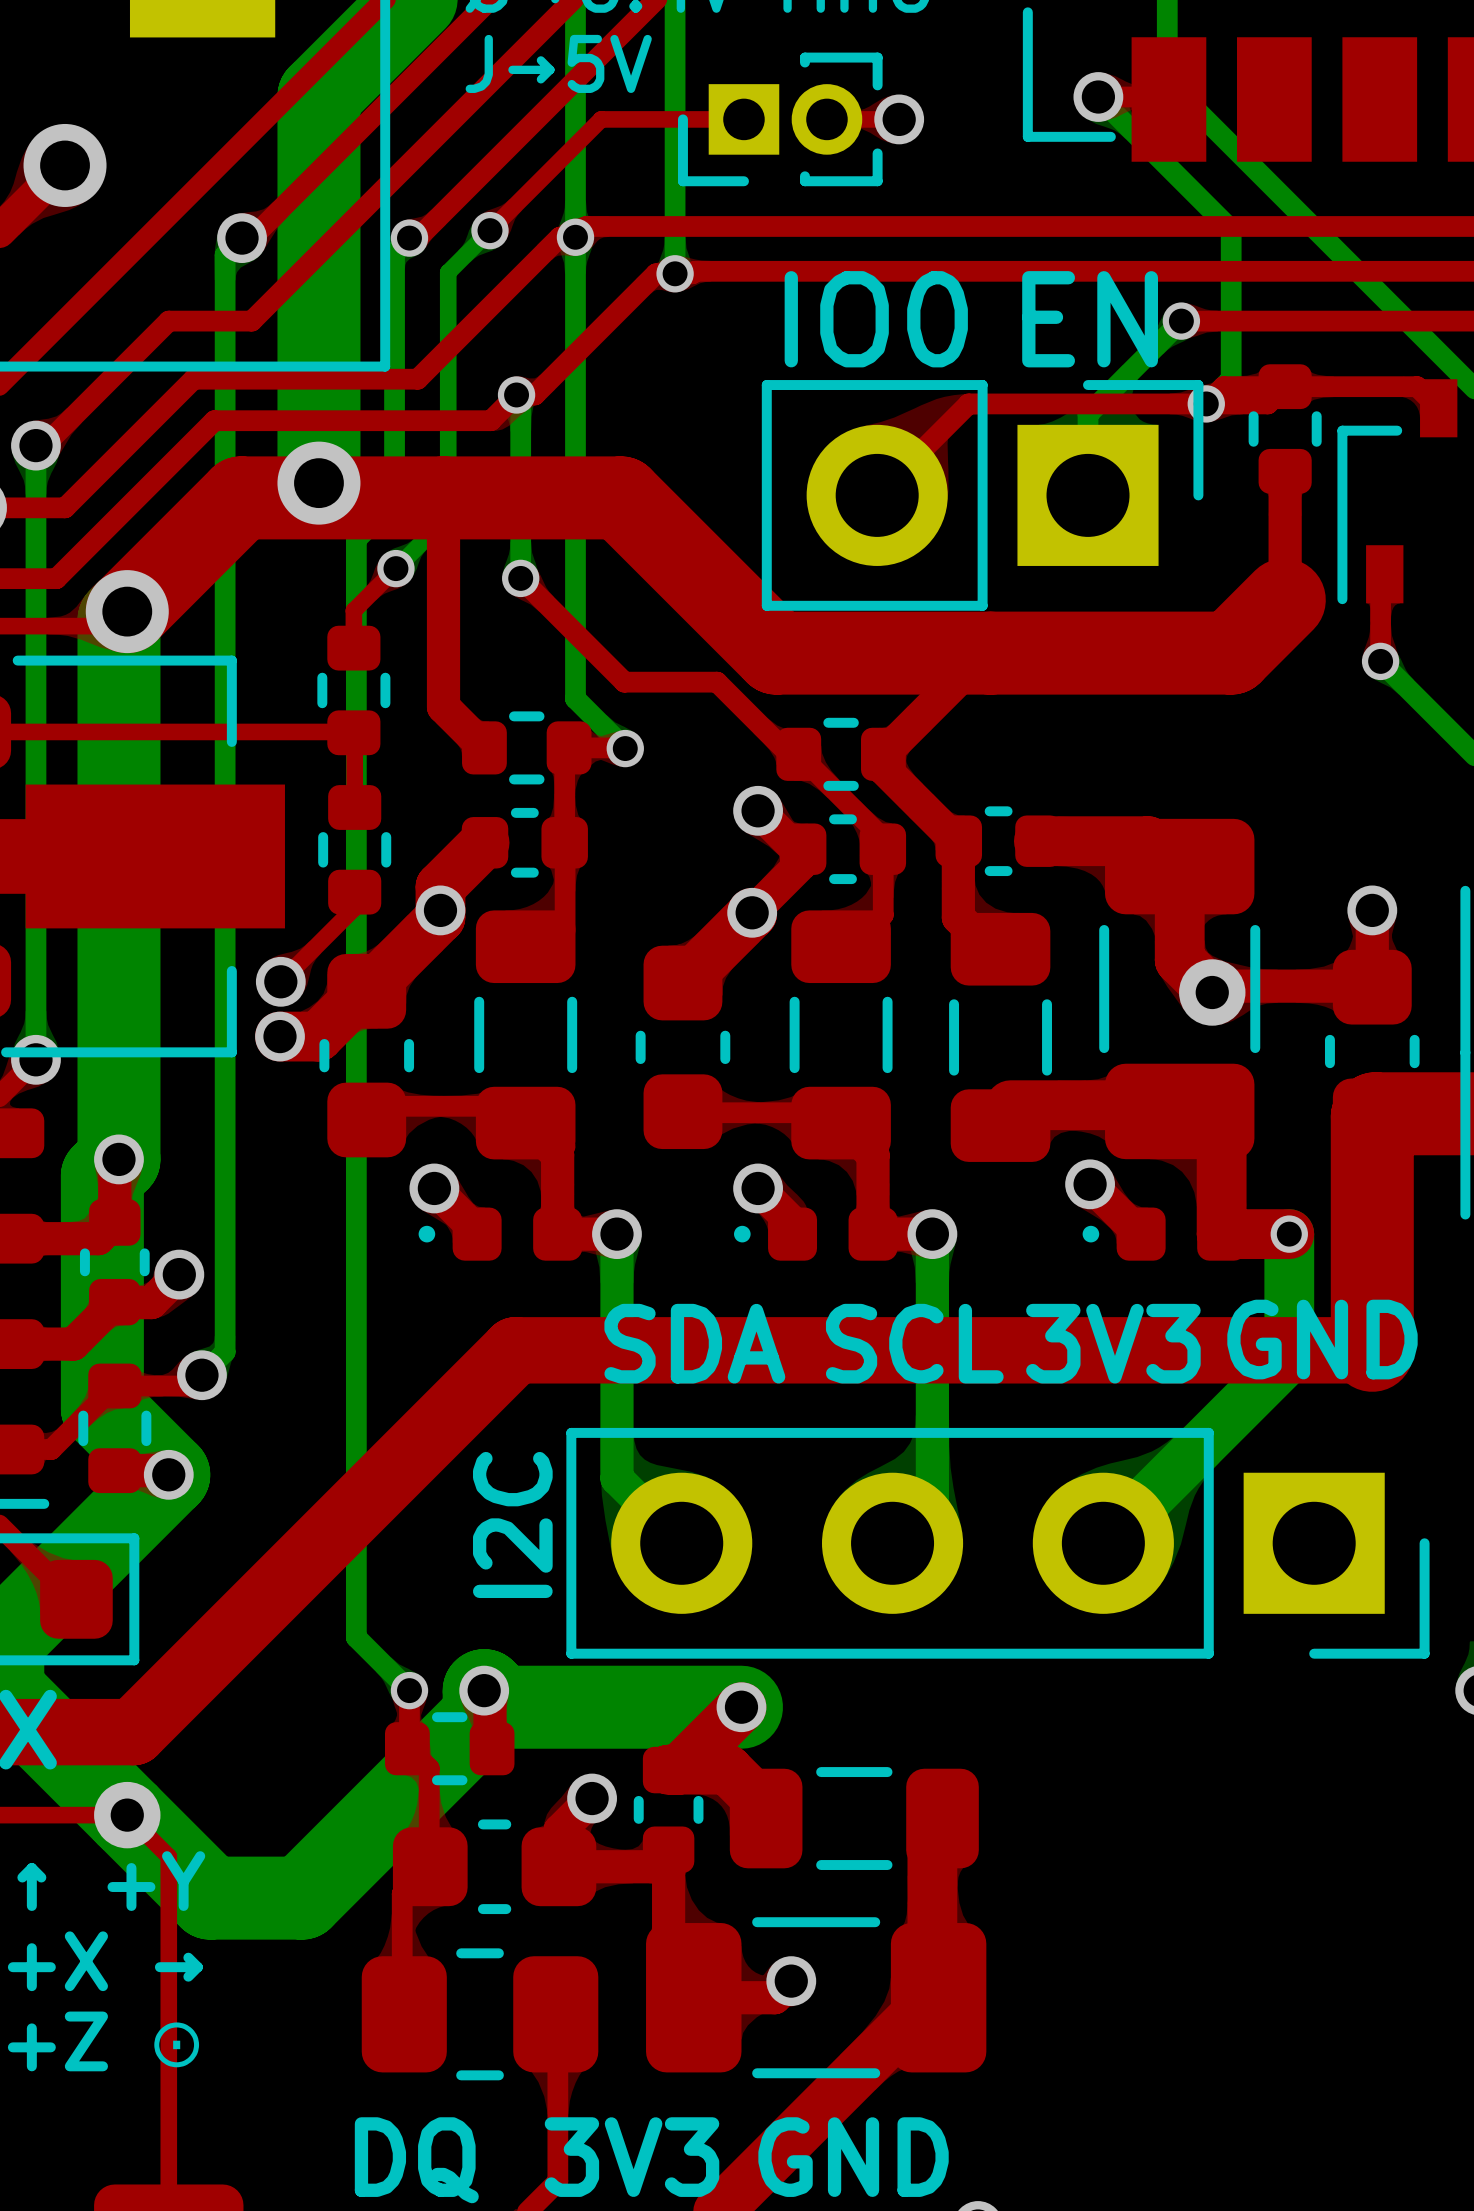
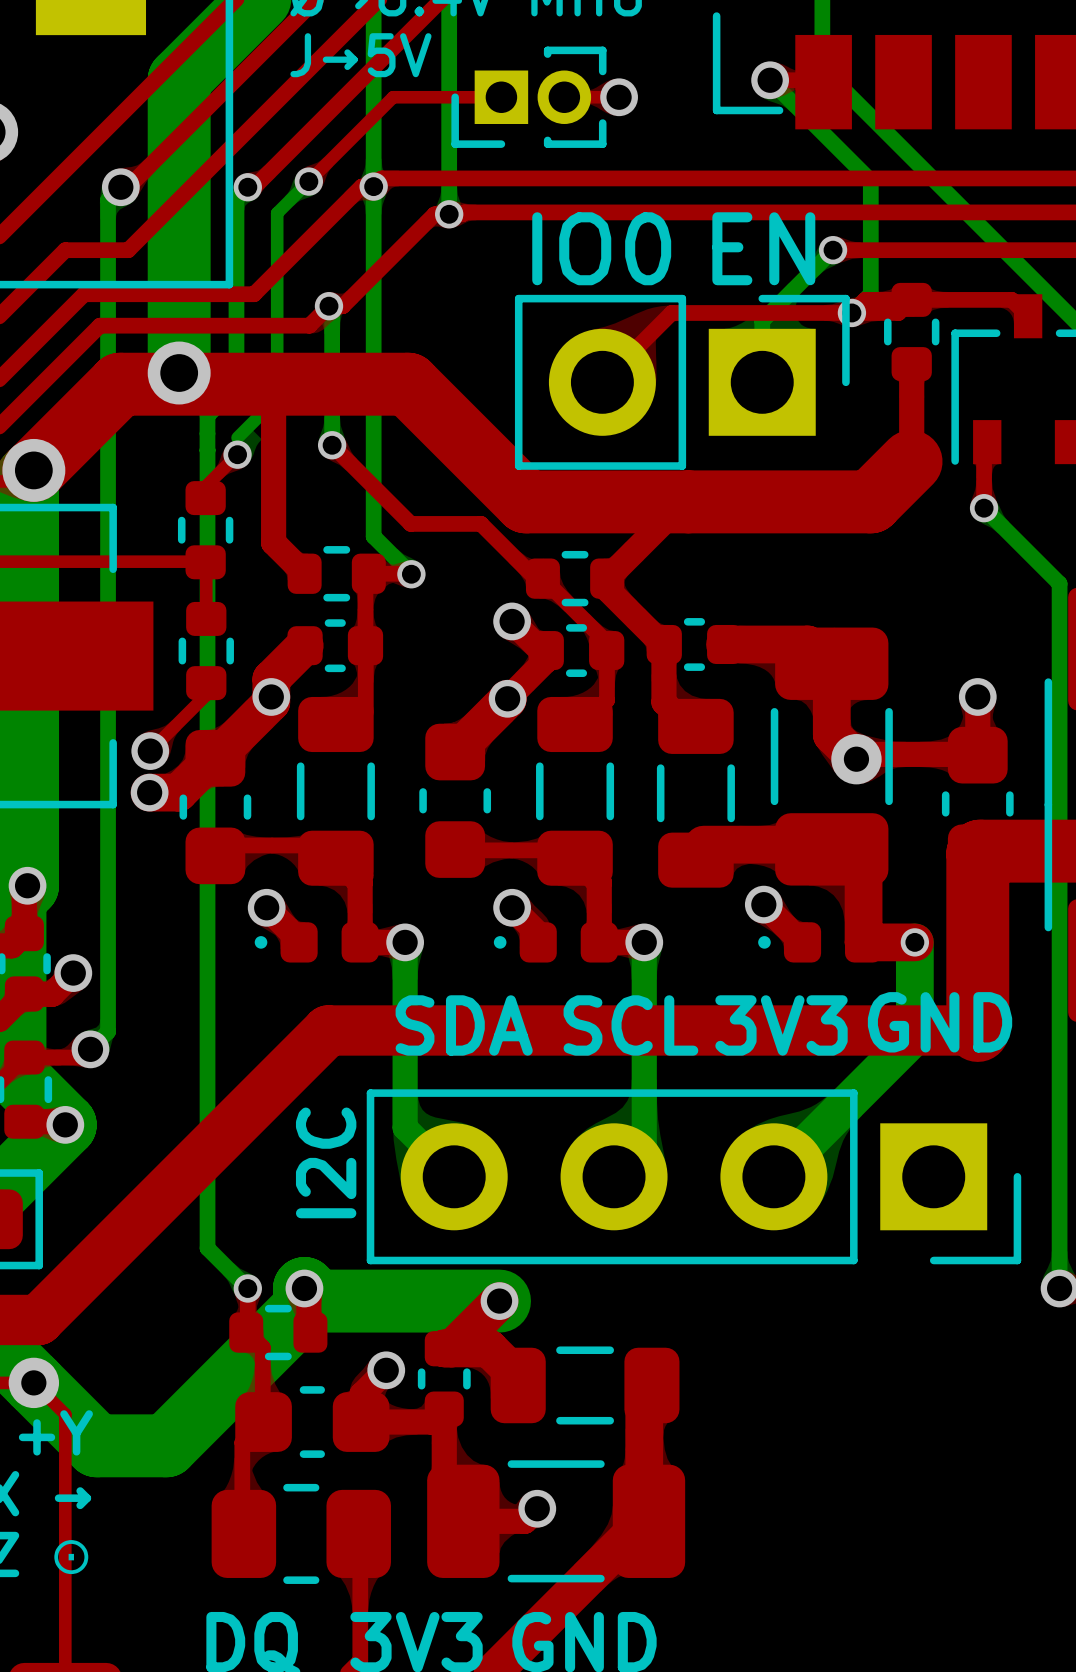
top track: (395, 568) (353, 610) (353, 632) -> (237, 454) (205, 486)
via position: (395, 568) -> (237, 454)

